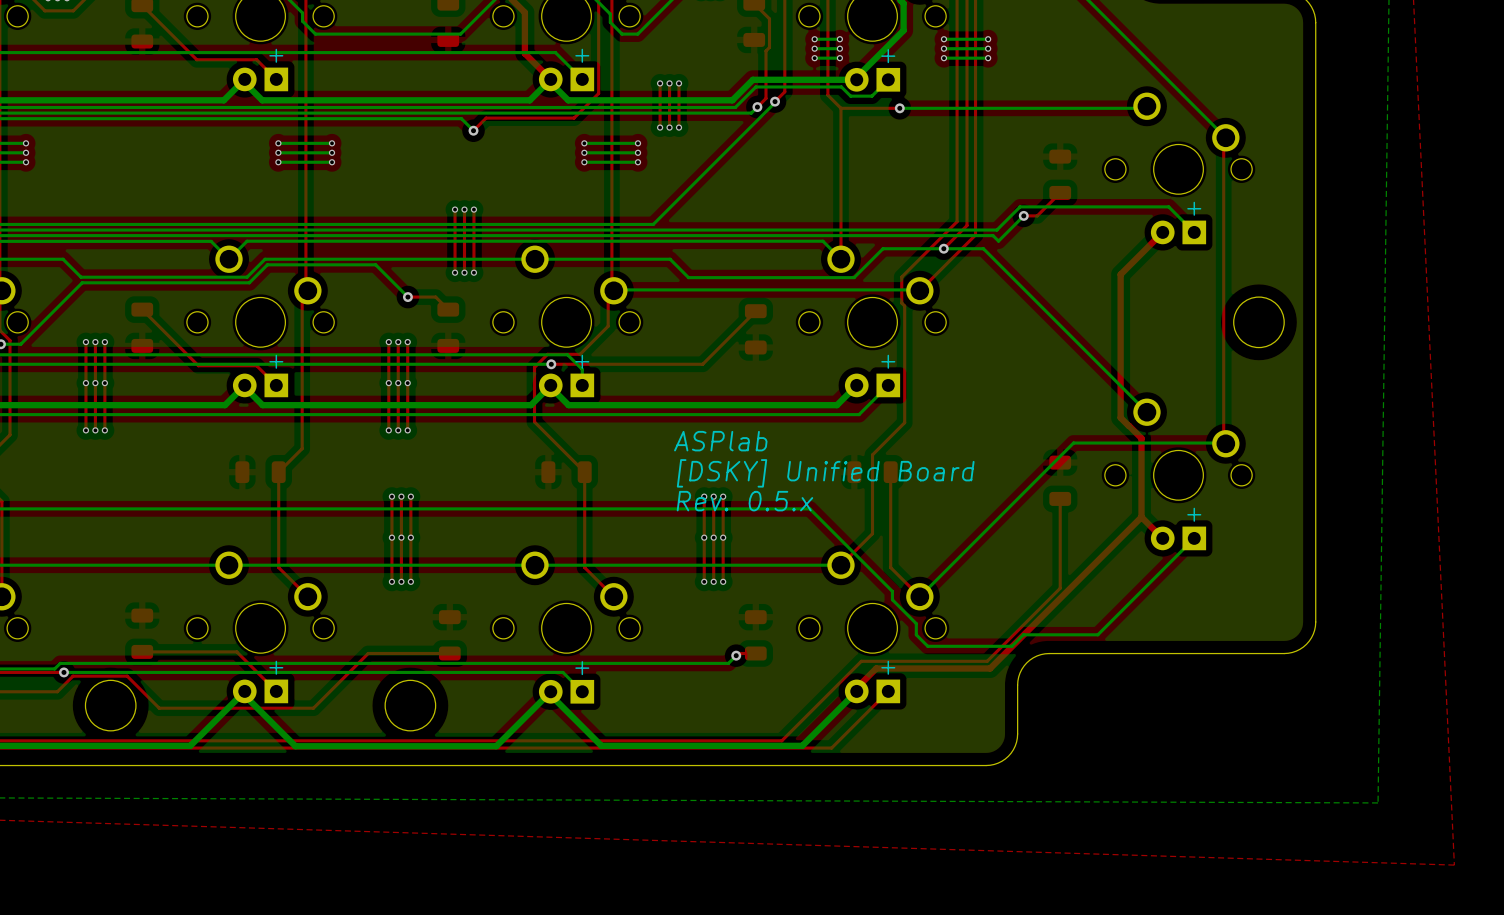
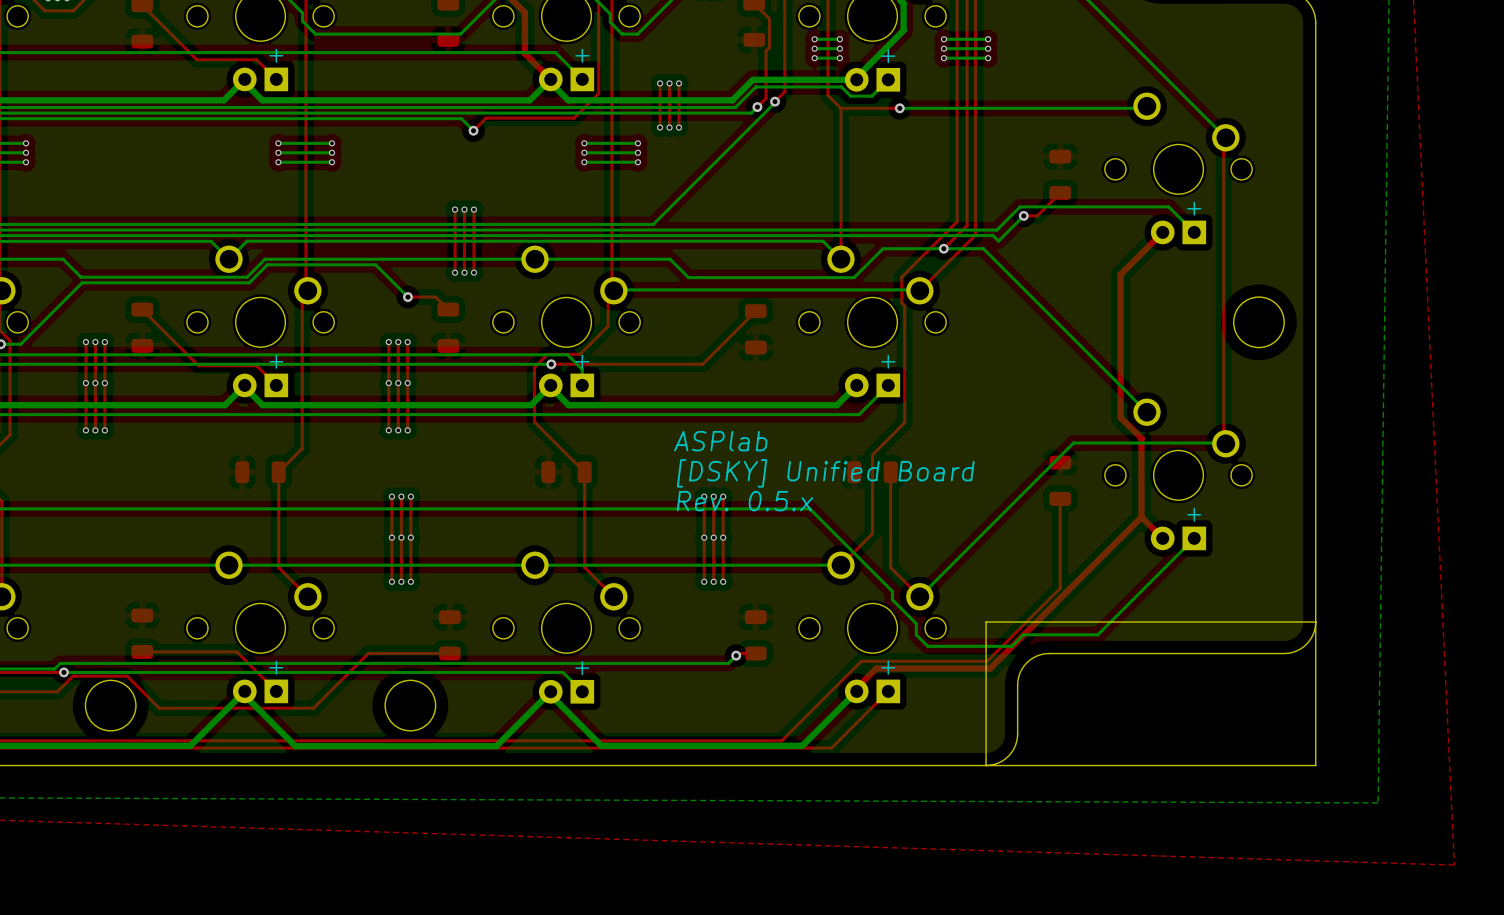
board edge: none -> (1315, 622) (1315, 765) (986, 765) (986, 622) (1315, 622)

